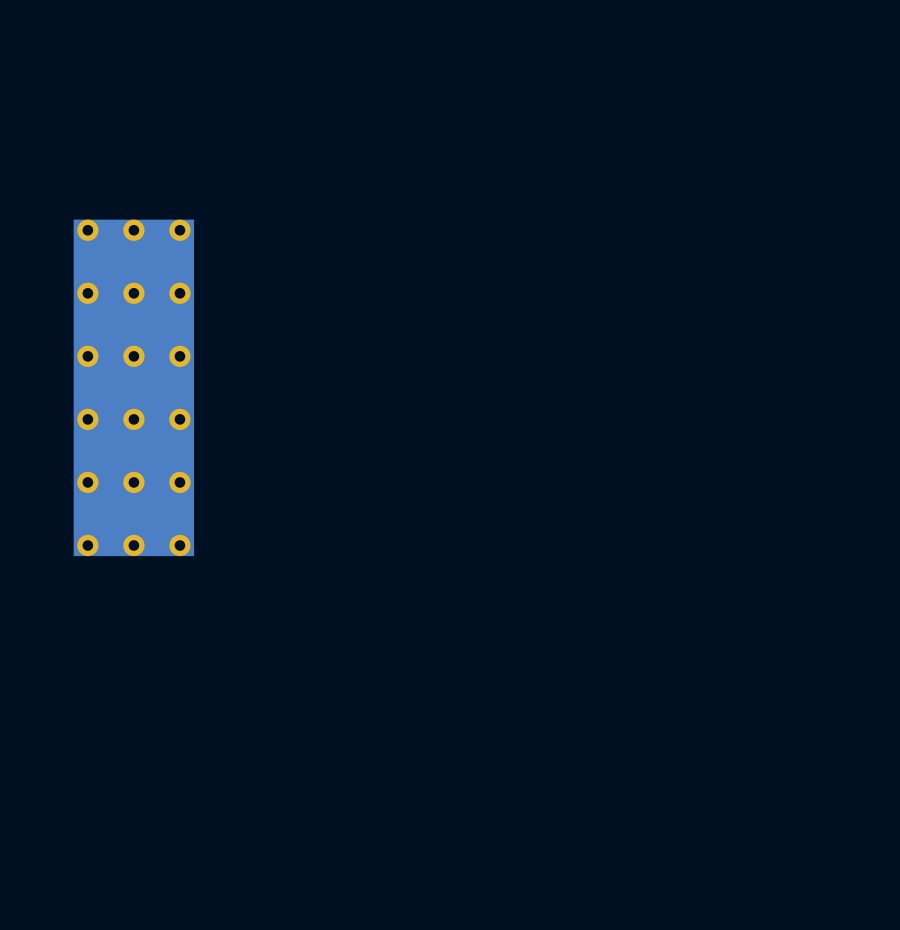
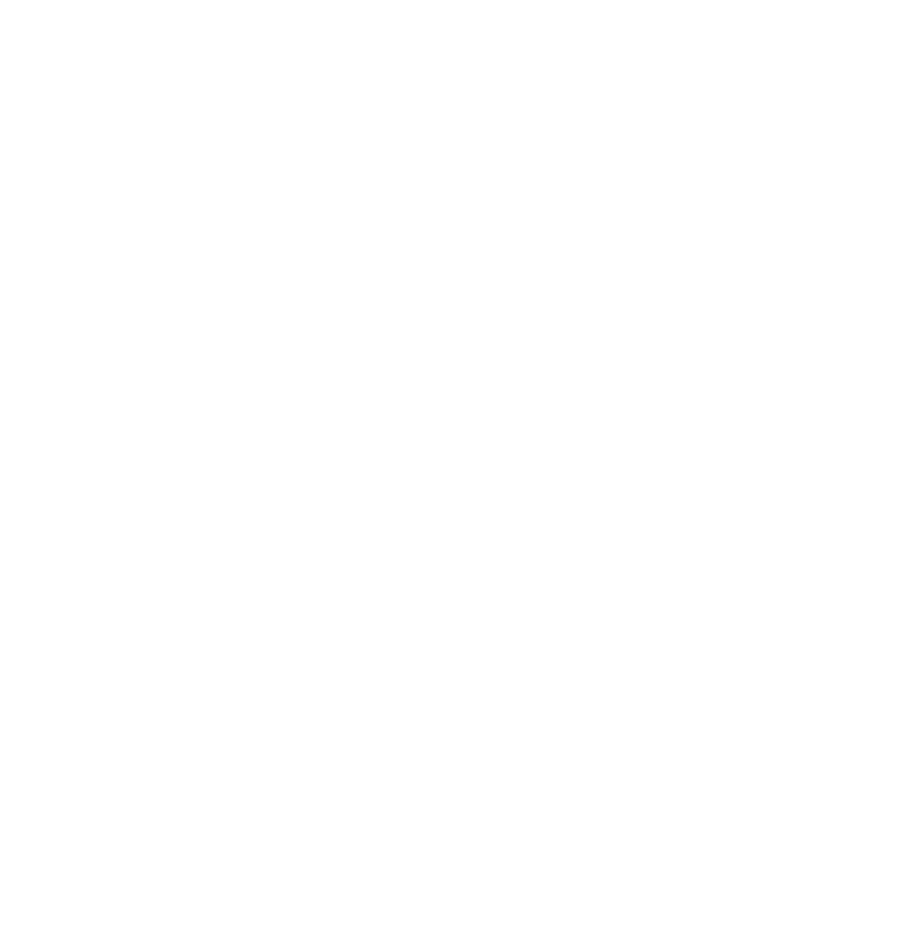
part: (133, 387) -> none

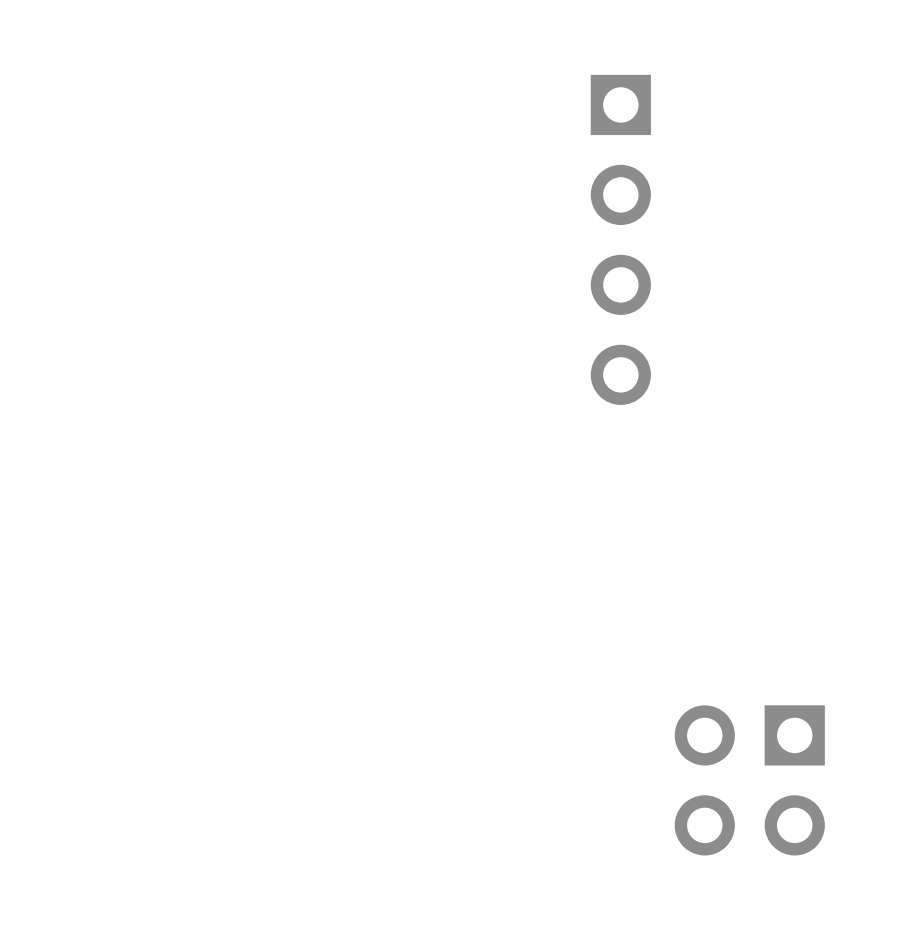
part: none -> (620, 239)
part: none -> (749, 780)

